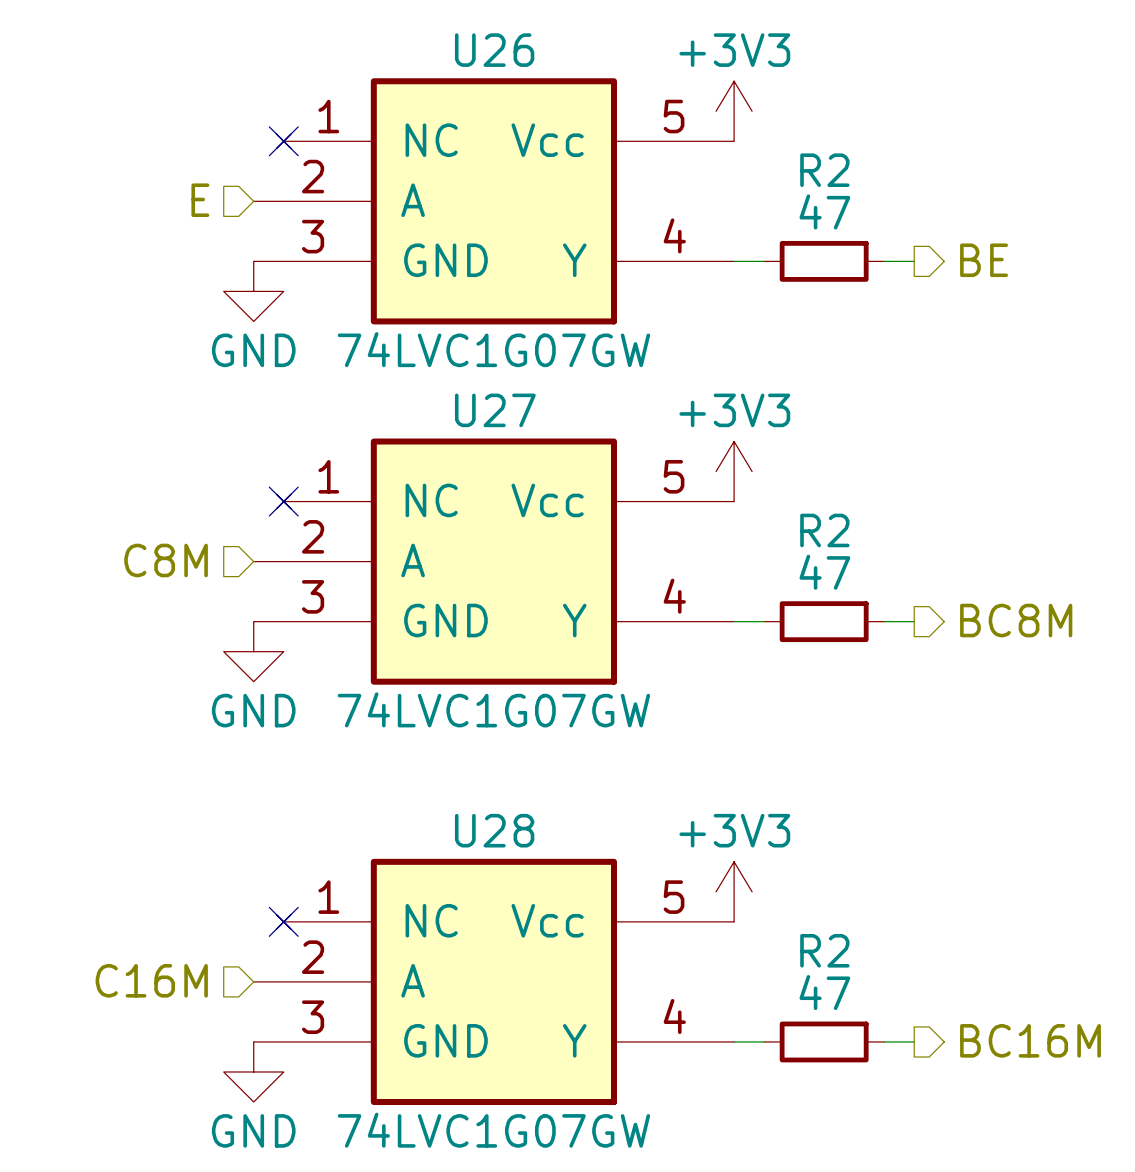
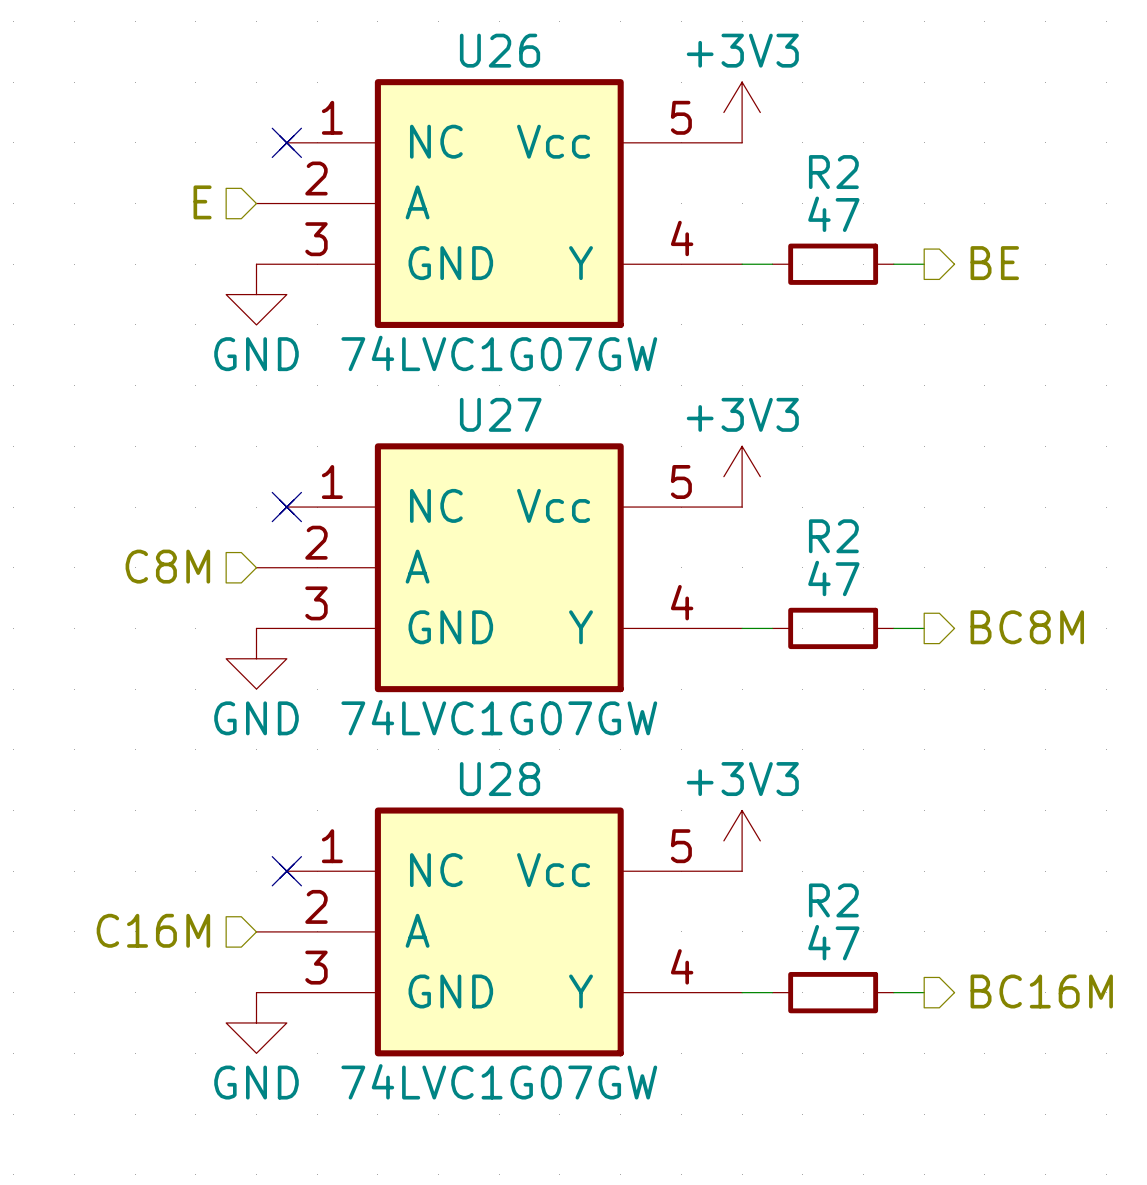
power symbol position: +3V3 (734, 891) -> +3V3 (742, 840)
no-connect mark position: (283, 921) -> (286, 871)
hierarchical label position: C16M (151, 980) -> C16M (153, 930)
U28 position: (493, 981) -> (499, 931)
hierarchical label position: BC16M (1030, 1040) -> BC16M (1041, 991)
wire: (734, 1041) (764, 1041) -> (742, 992) (772, 992)
R2 position: (824, 1041) -> (833, 992)
wire: (884, 1041) (914, 1041) -> (893, 992) (924, 992)
power symbol position: GND (253, 1071) -> GND (256, 1022)

